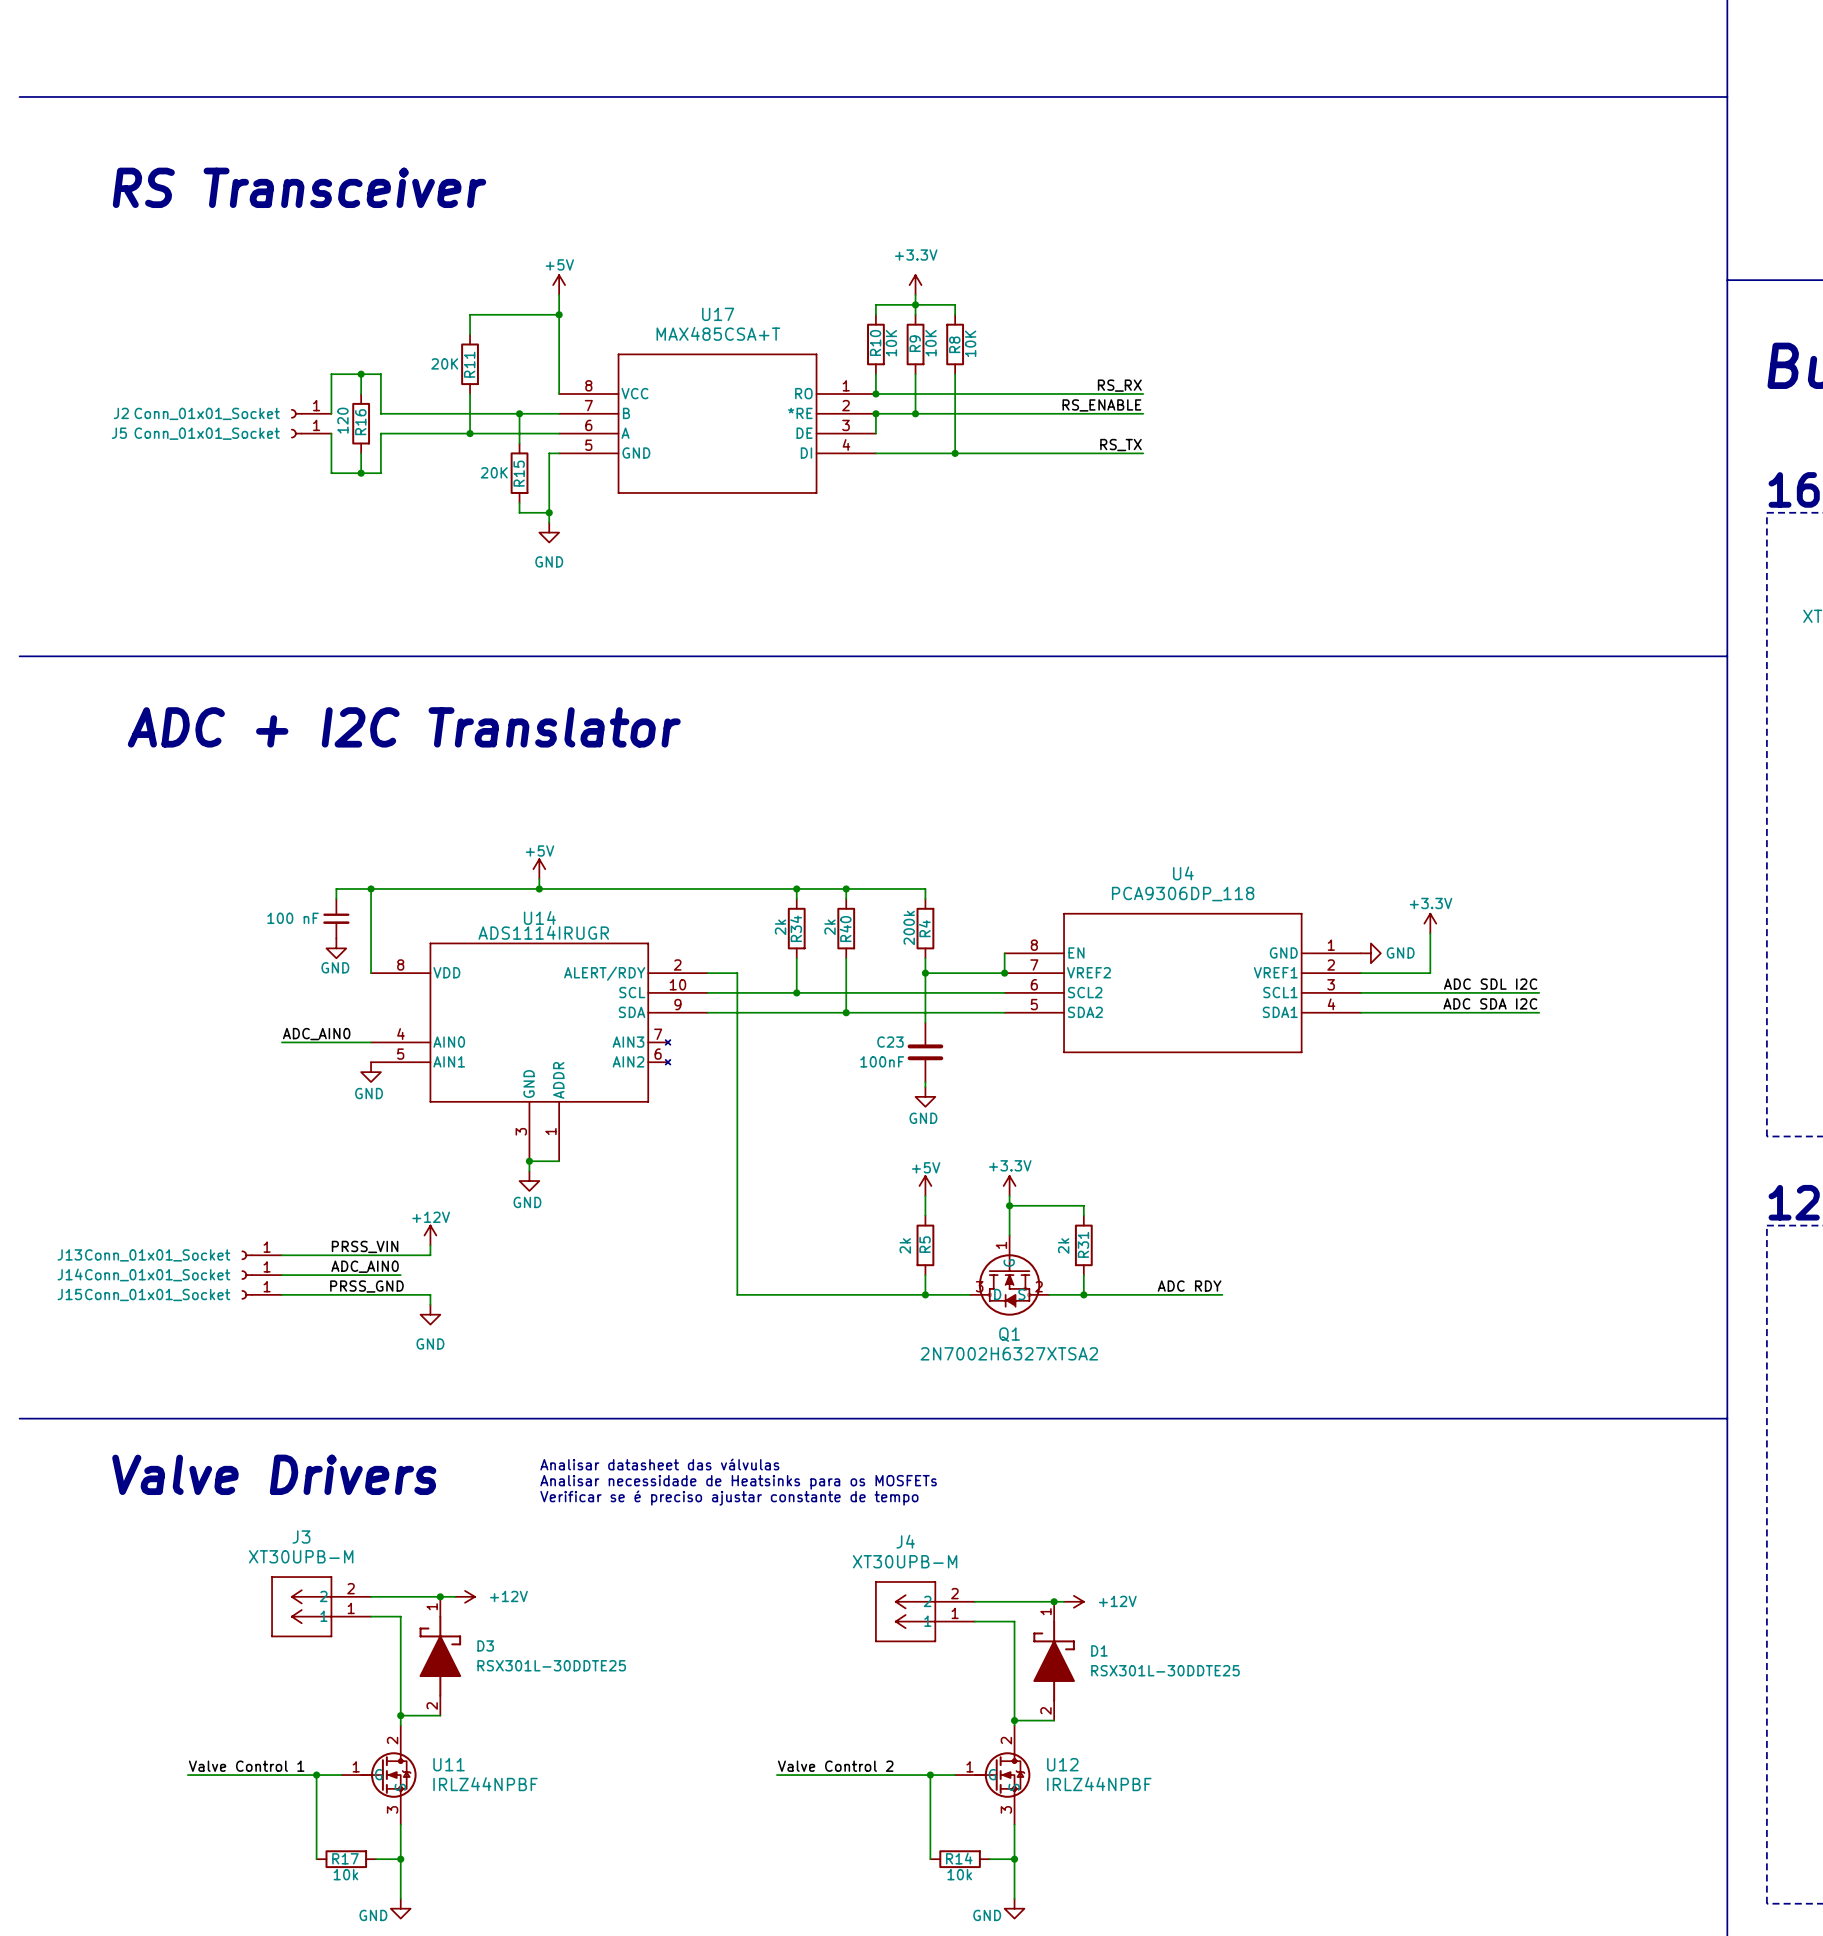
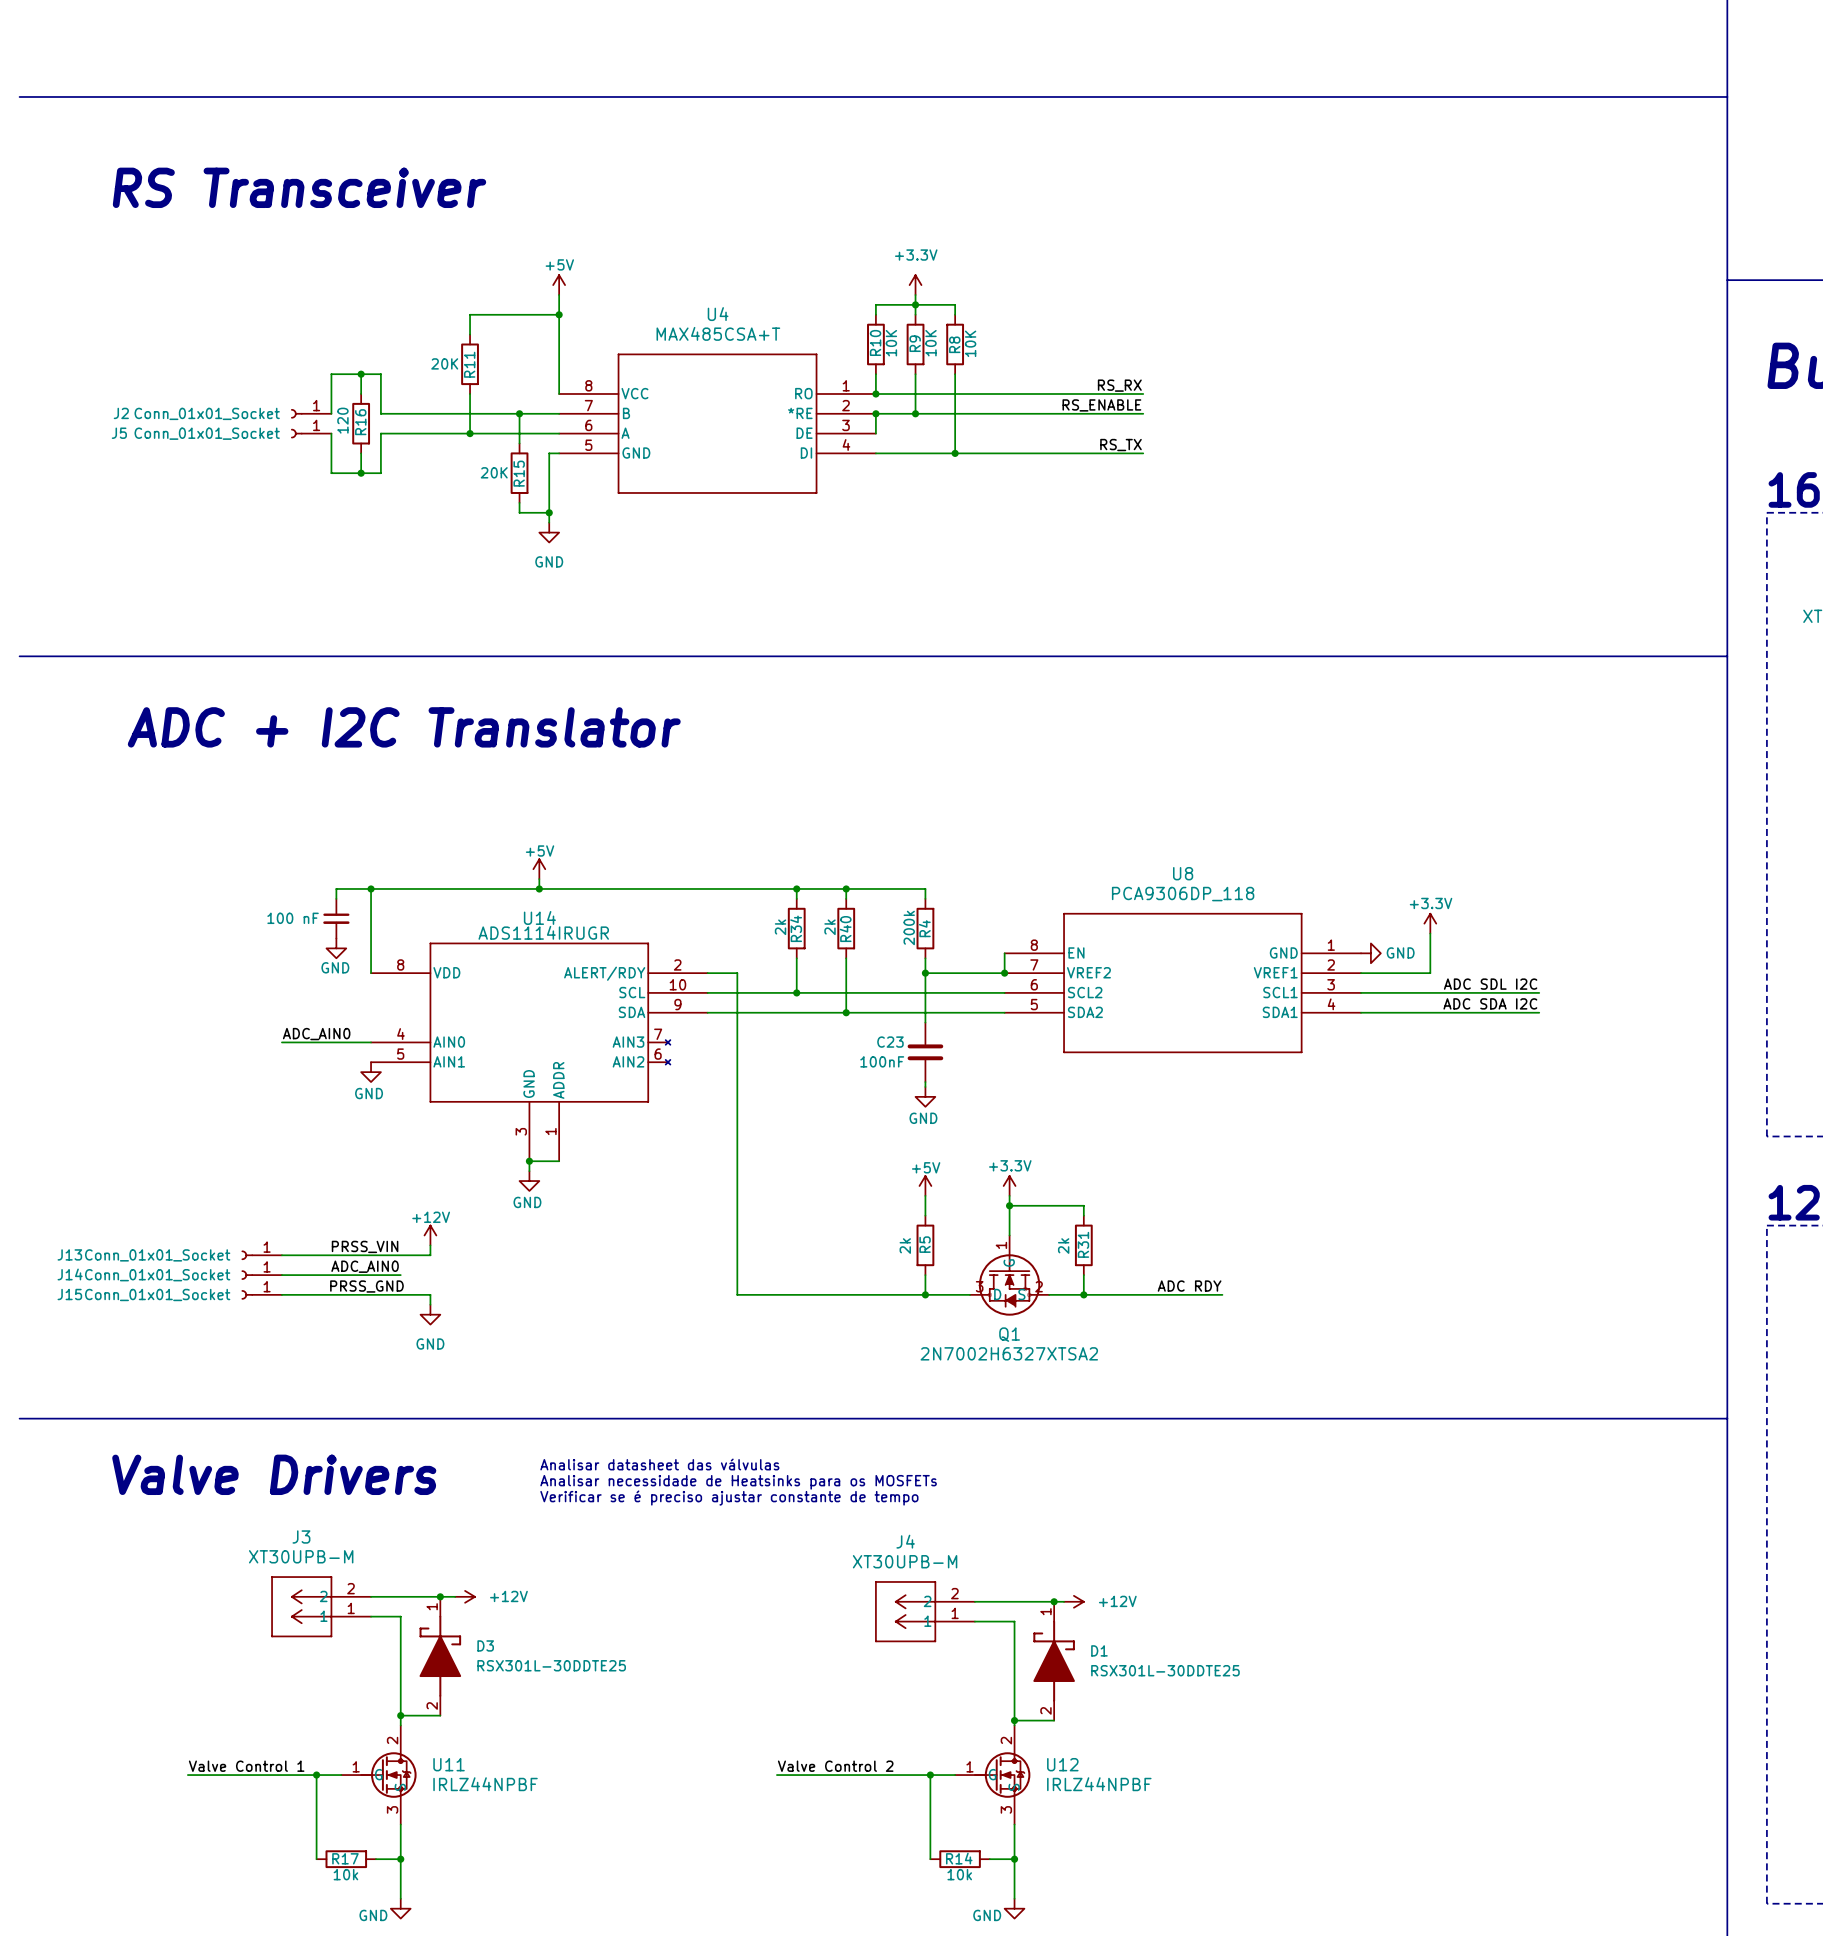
U17 name: U17 (718, 314) -> U4 (718, 314)
U4 name: U4 (1183, 873) -> U8 (1183, 873)

